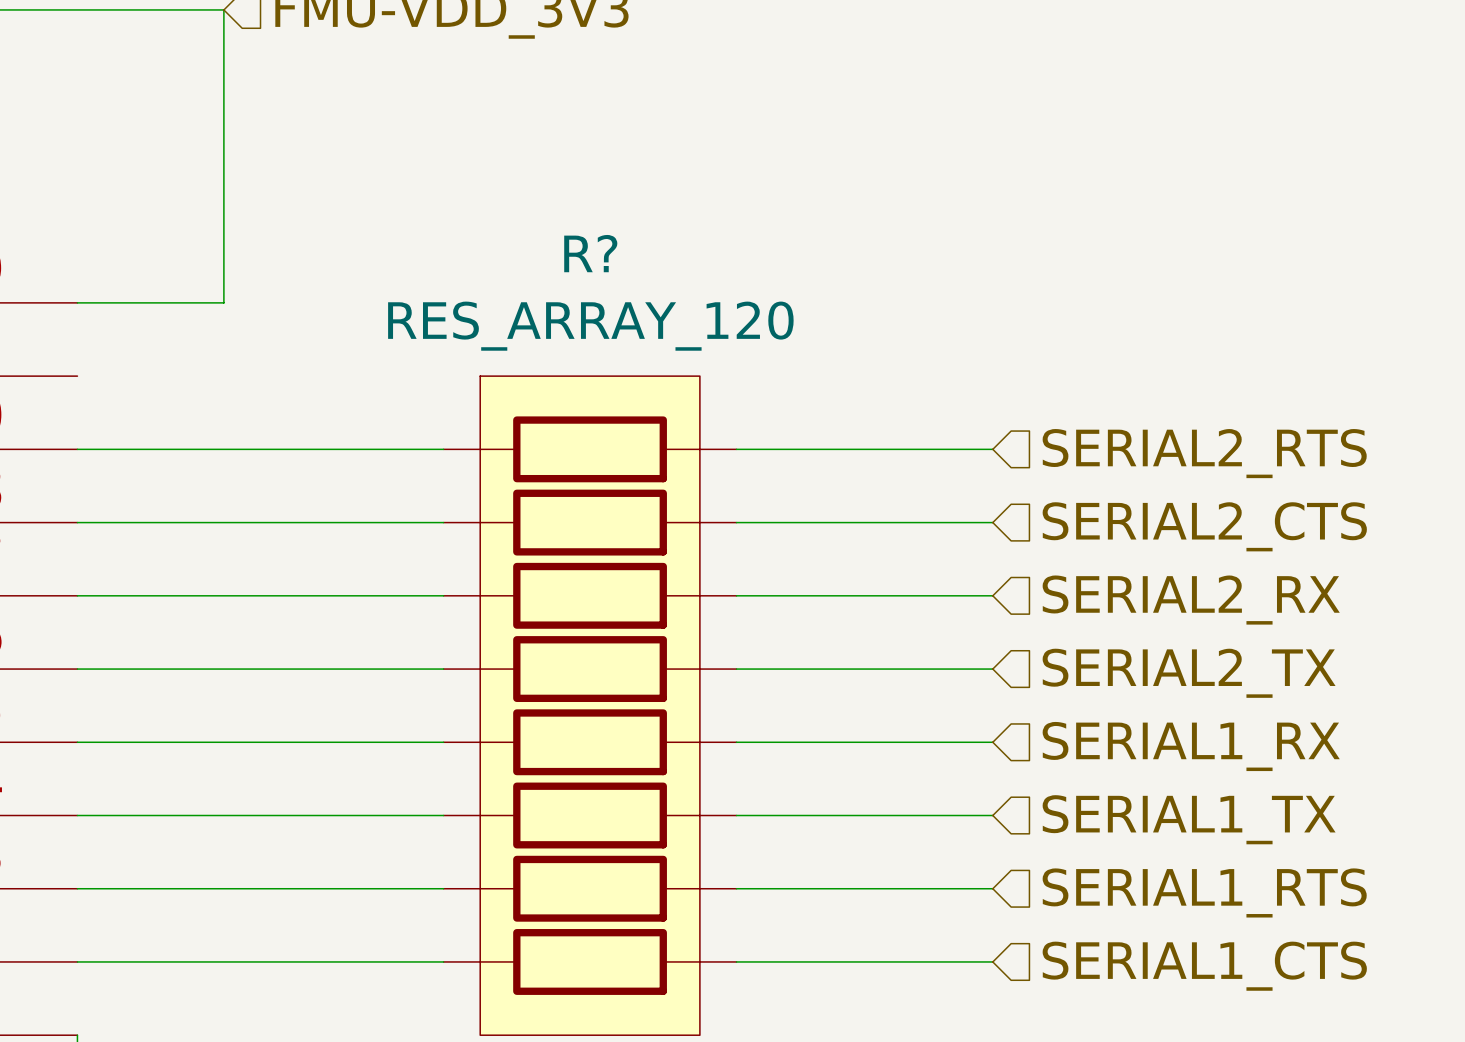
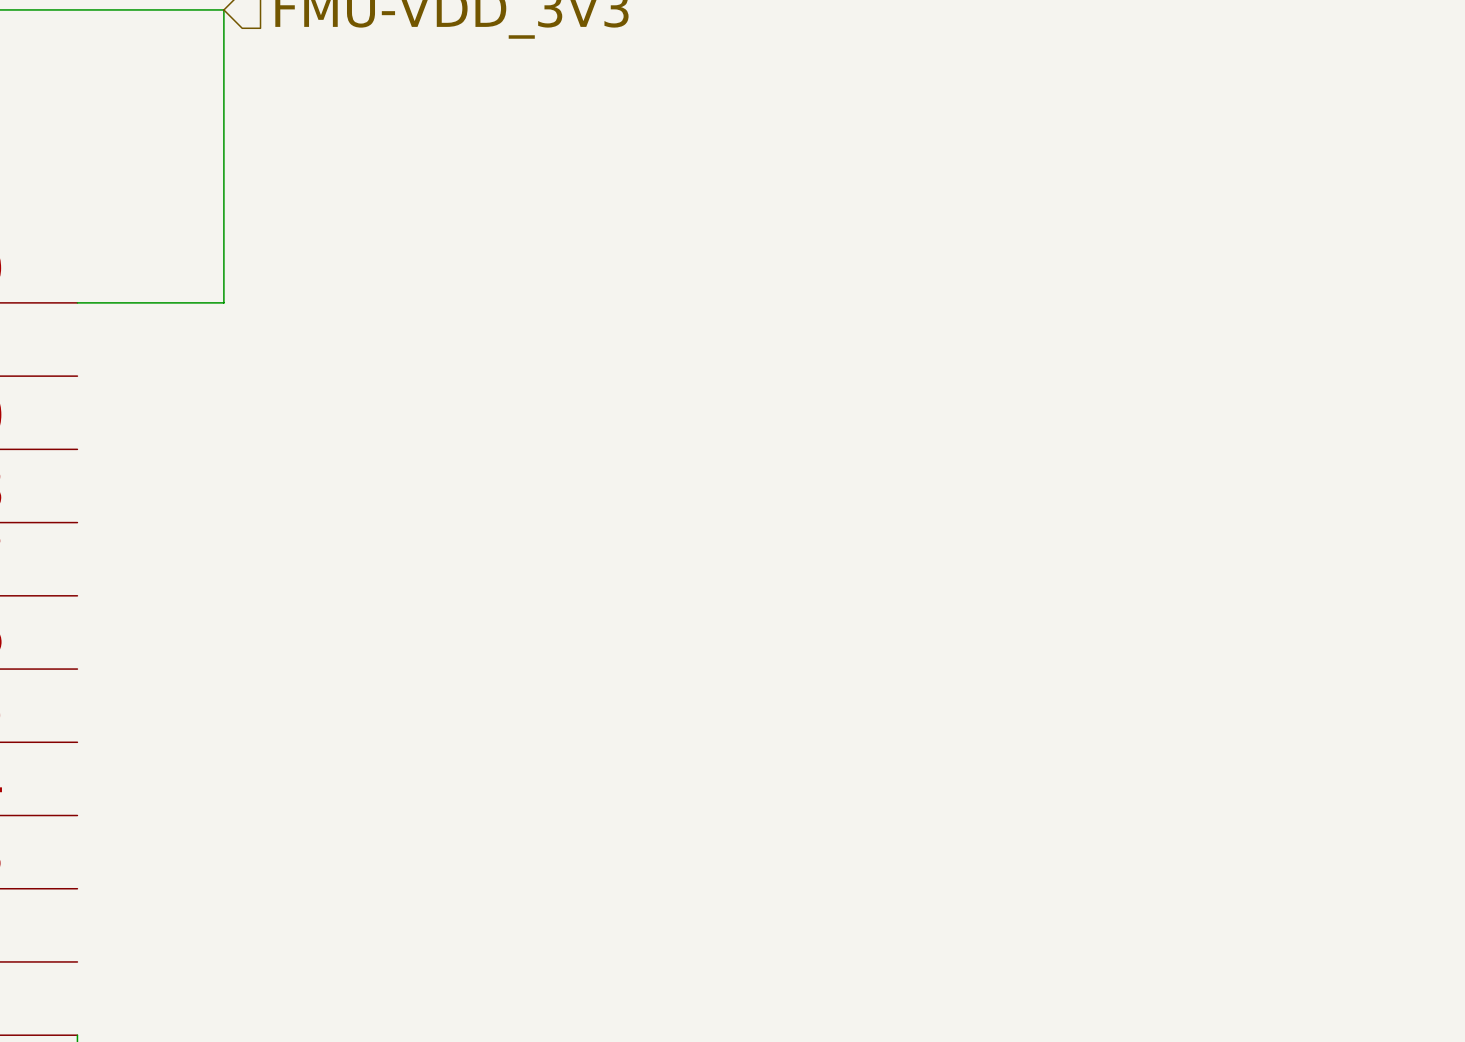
wire: (77, 449) (443, 449) -> none
wire: (736, 449) (992, 449) -> none
hierarchical label: SERIAL2_RTS (1204, 453) -> none
wire: (77, 522) (443, 522) -> none
wire: (736, 522) (992, 522) -> none
hierarchical label: SERIAL2_CTS (1204, 526) -> none
wire: (77, 595) (443, 595) -> none
wire: (736, 595) (992, 595) -> none
hierarchical label: SERIAL2_RX (1191, 600) -> none
wire: (77, 669) (443, 669) -> none
wire: (736, 669) (992, 669) -> none
hierarchical label: SERIAL2_TX (1189, 673) -> none
R?: RES_ARRAY_120 (590, 705) -> none
wire: (77, 742) (443, 742) -> none
wire: (736, 742) (992, 742) -> none
hierarchical label: SERIAL1_RX (1191, 746) -> none
wire: (77, 815) (443, 815) -> none
wire: (736, 815) (992, 815) -> none
hierarchical label: SERIAL1_TX (1189, 819) -> none
wire: (77, 888) (443, 888) -> none
wire: (736, 888) (992, 888) -> none
hierarchical label: SERIAL1_RTS (1204, 892) -> none
wire: (77, 961) (443, 961) -> none
wire: (736, 961) (992, 961) -> none
hierarchical label: SERIAL1_CTS (1204, 966) -> none

